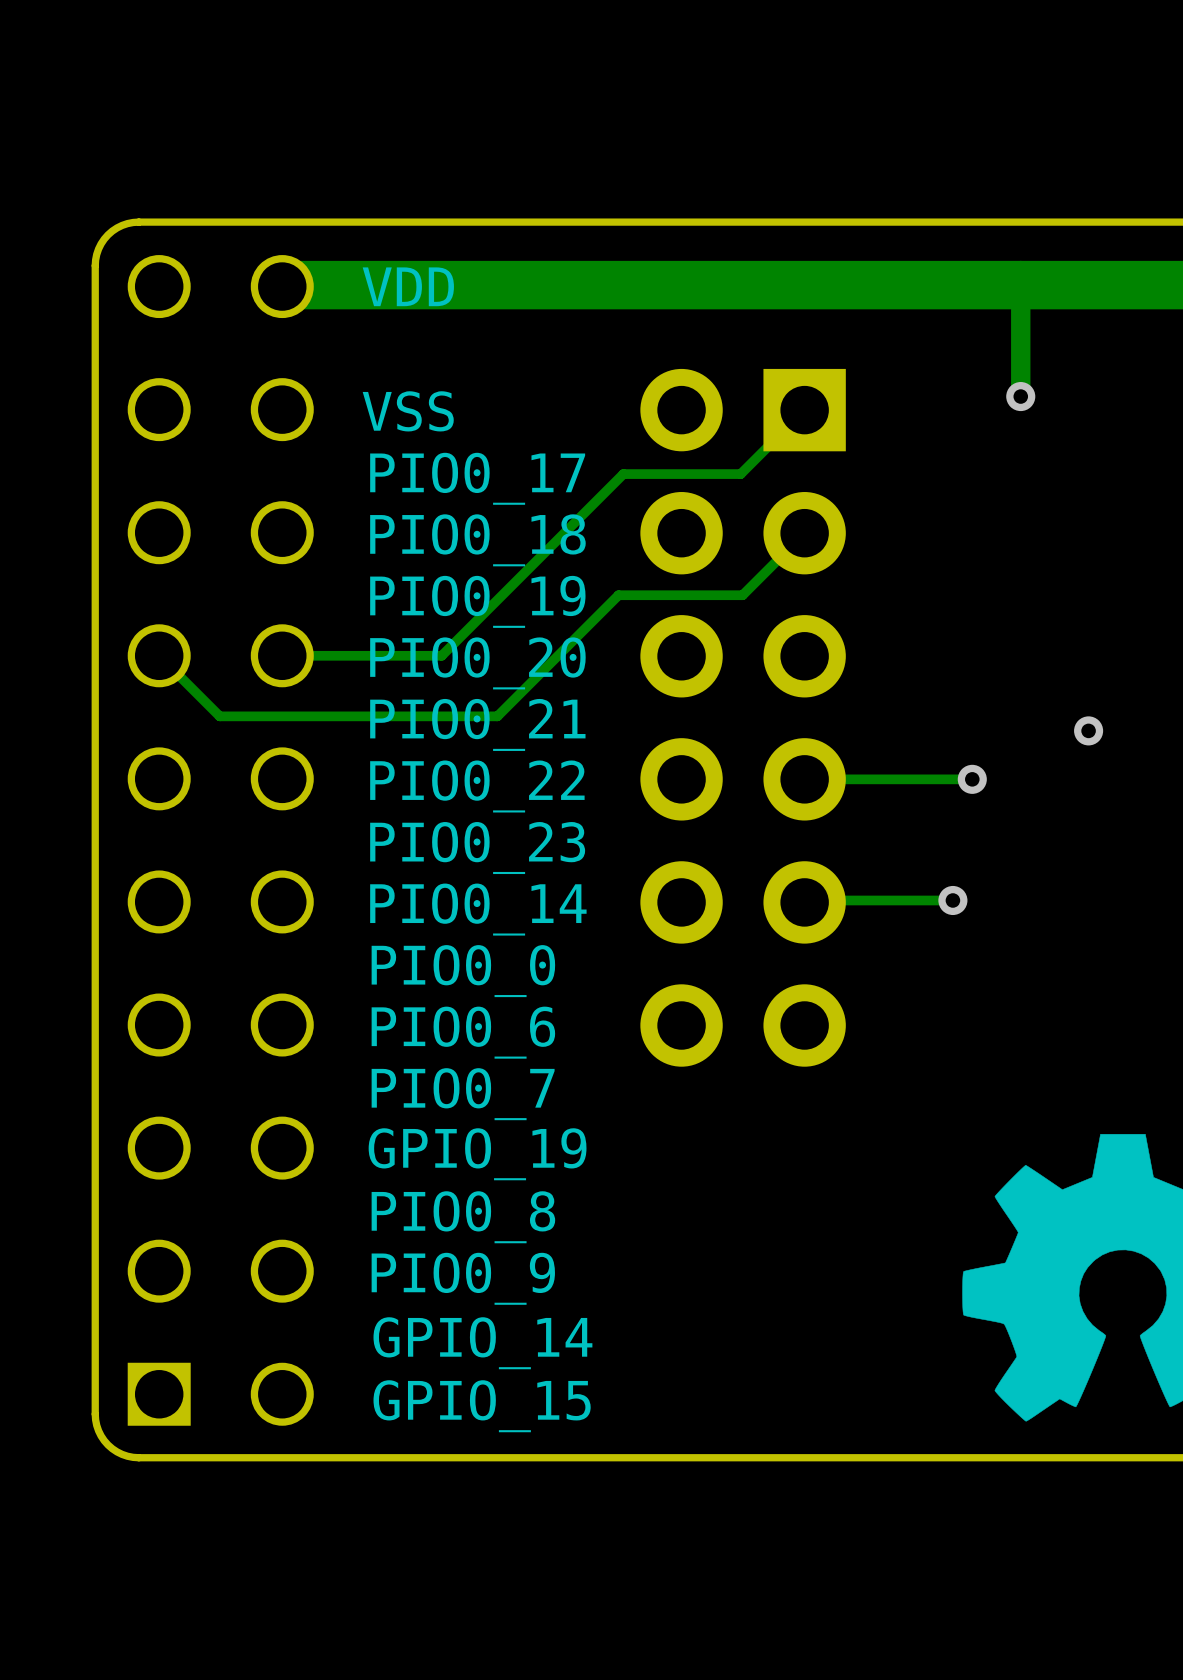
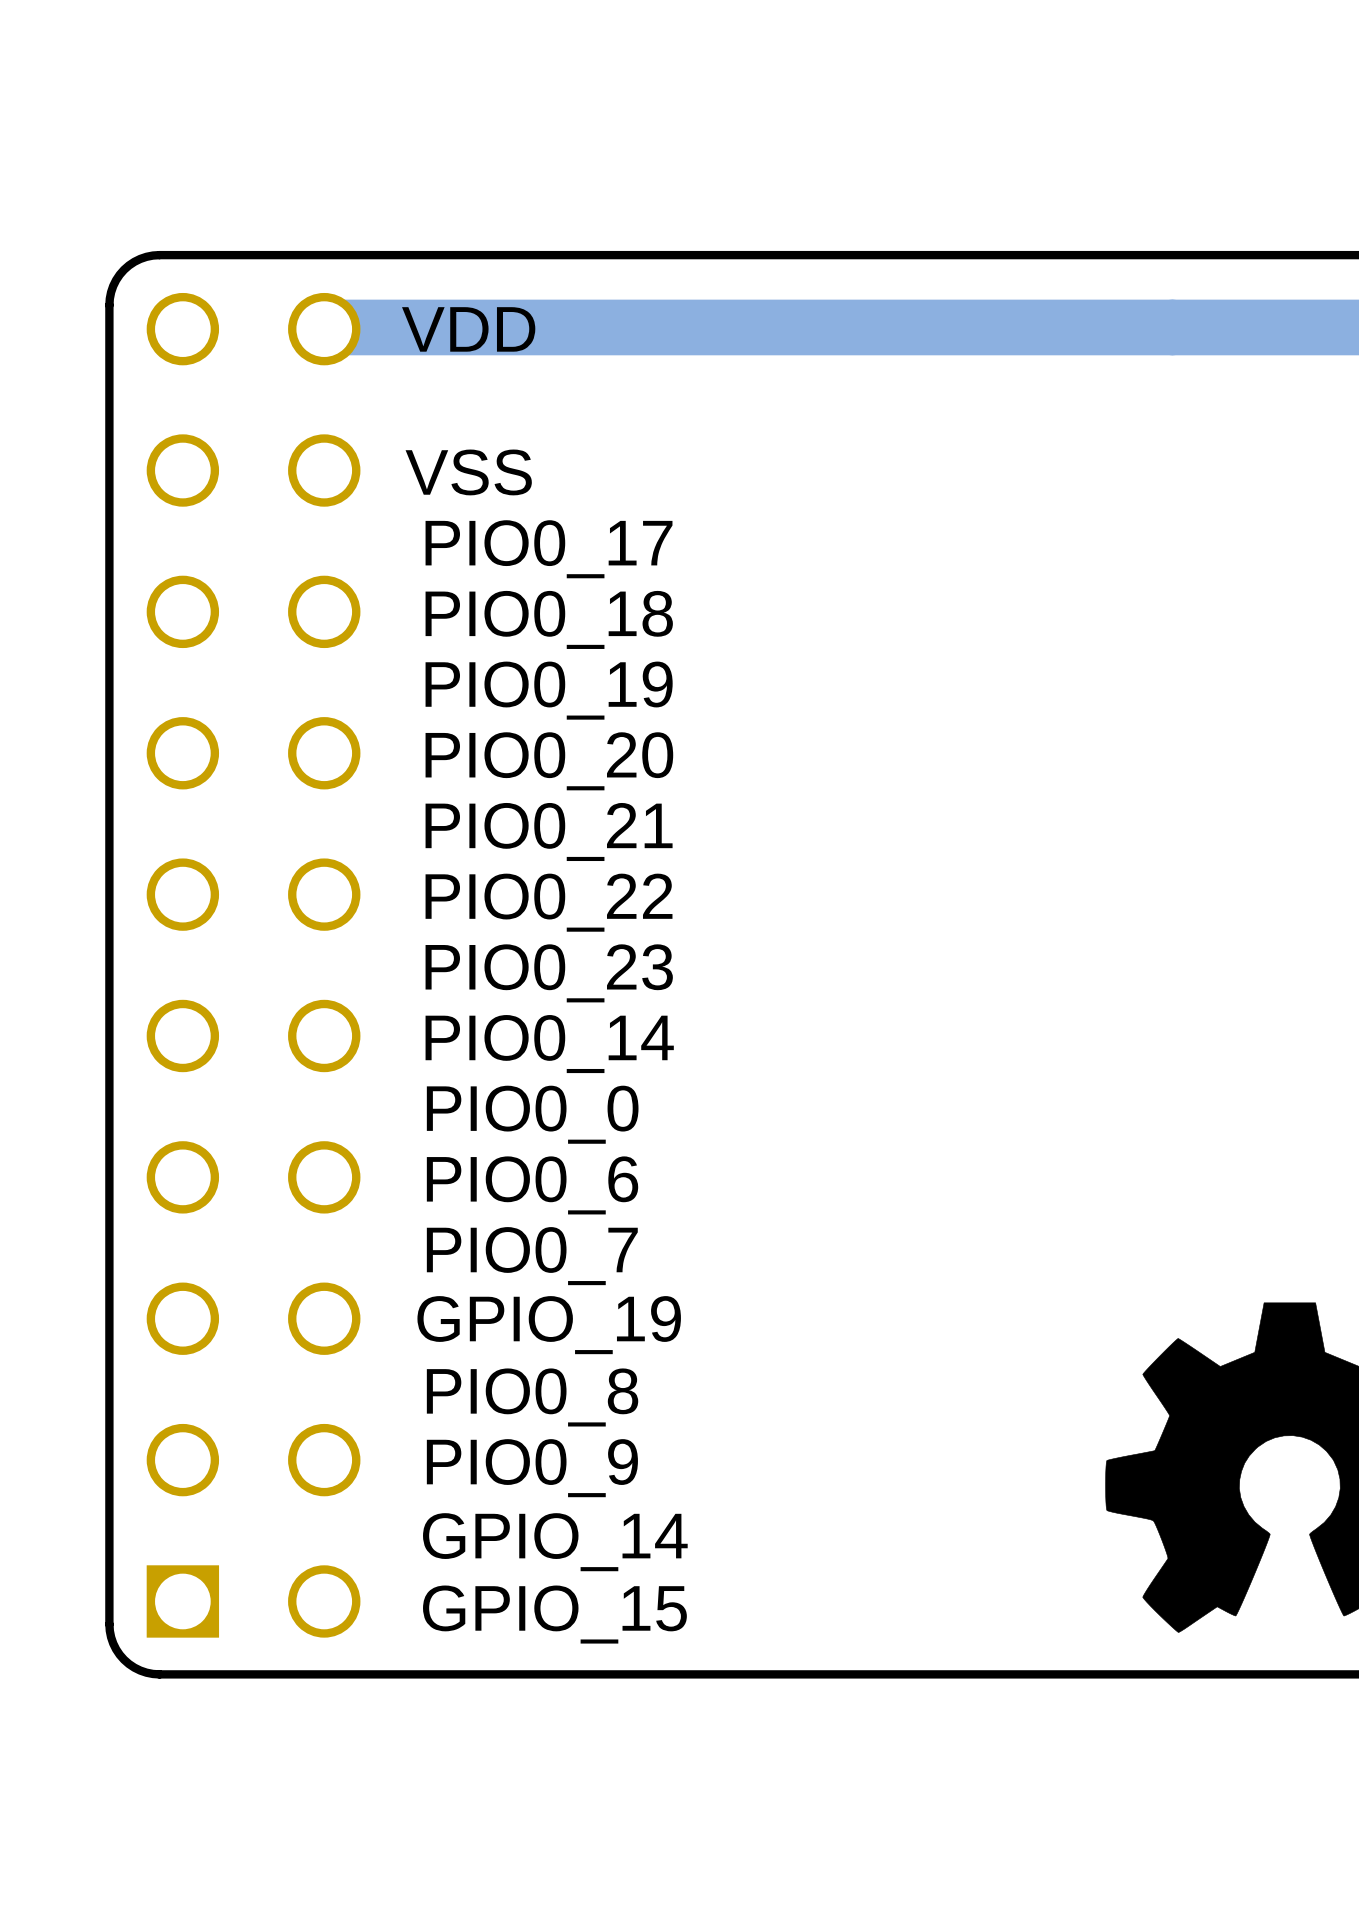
track: (1020, 285) (1020, 396) -> none
via: (1020, 396) -> none
track: (804, 410) (740, 474) (623, 474) (441, 655) (282, 655) -> none
track: (804, 533) (742, 595) (618, 595) (497, 716) (219, 716) (159, 655) -> none
part: (743, 717) -> none
via: (1088, 730) -> none
track: (972, 779) (804, 779) -> none
via: (972, 779) -> none
track: (952, 900) (806, 900) (804, 902) -> none
via: (952, 900) -> none

